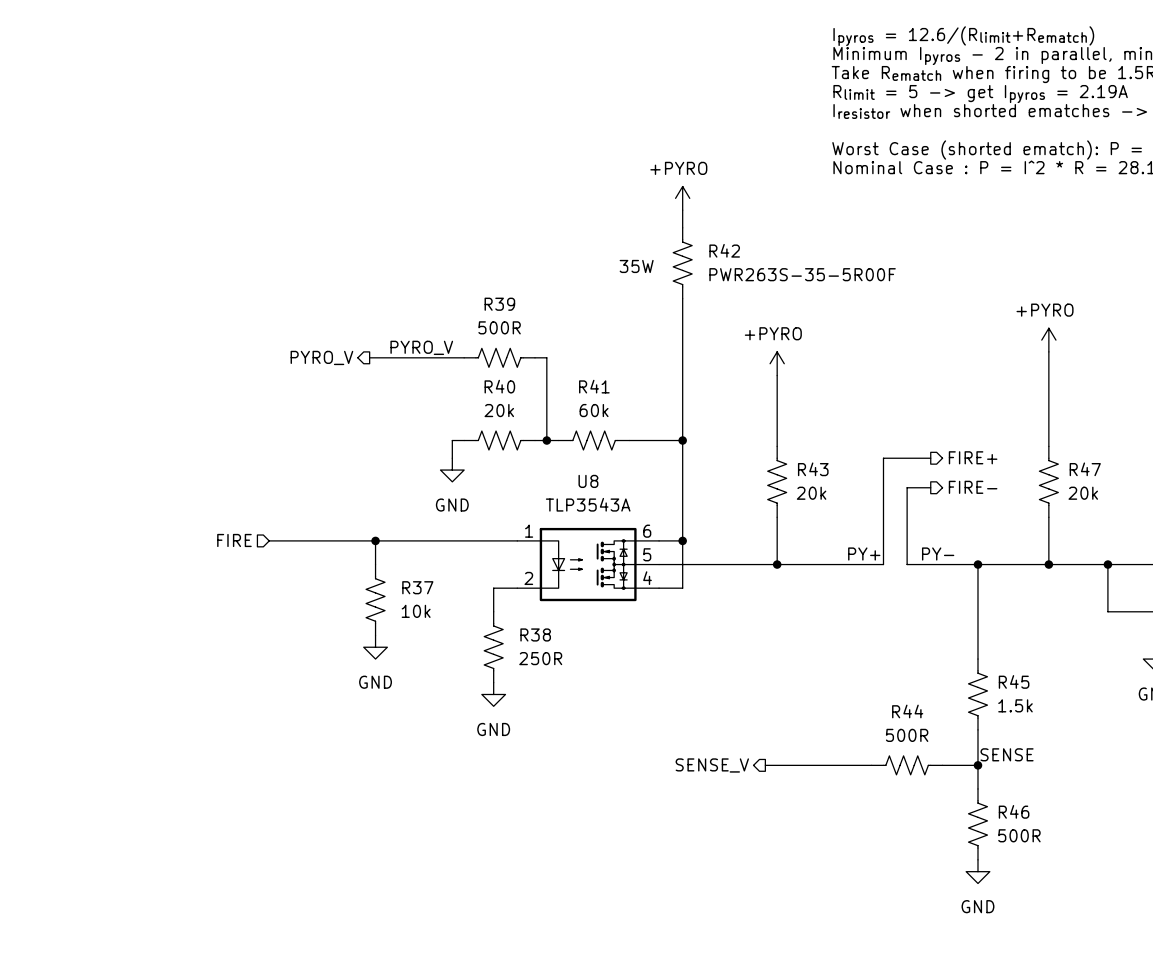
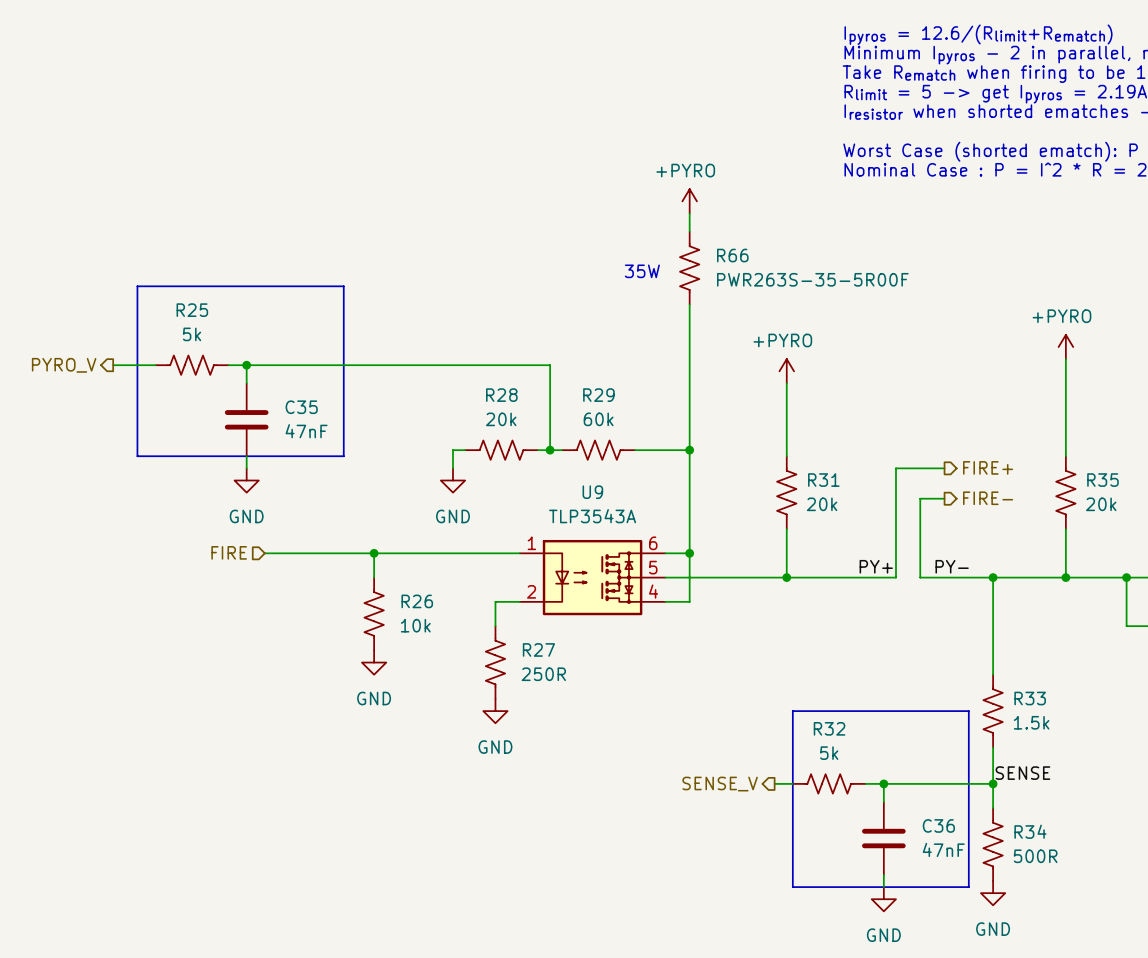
R42 name: R42 (724, 250) -> R66 (732, 255)
line: none -> (137, 286) (343, 286) (343, 456) (137, 456) (137, 286)
label: PYRO_V (421, 347) -> none
hierarchical label: none -> PYRO_V (64, 365)
wire: none -> (113, 365) (155, 365)
R25: none -> 5k (192, 365)
wire: none -> (228, 365) (368, 365)
wire: none -> (246, 365) (246, 383)
junction: none -> (246, 365)
hierarchical label: PYRO_V (321, 357) -> none
R39: 500R (499, 357) -> none
R40 name: R40 (499, 386) -> R28 (501, 395)
R41 name: R41 (594, 386) -> R29 (598, 395)
C35: none -> 47nF (246, 419)
wire: none -> (246, 456) (246, 468)
R43 name: R43 (813, 469) -> R31 (823, 480)
R47 name: R47 (1085, 469) -> R35 (1102, 480)
power symbol: none -> GND (246, 480)
U8 name: U8 (588, 481) -> U9 (592, 492)
R37 name: R37 (417, 587) -> R26 (417, 601)
R38 name: R38 (535, 634) -> R27 (538, 649)
R45 name: R45 (1014, 681) -> R33 (1030, 698)
line: none -> (792, 711) (968, 711) (968, 887) (792, 887) (792, 711)
R32: none -> 5k (829, 783)
junction: none -> (883, 783)
R44: 500R (907, 765) -> none
wire: none -> (956, 783) (883, 783) (883, 802)
R46 name: R46 (1014, 811) -> R34 (1030, 831)
C36: none -> 47nF (883, 838)
wire: none -> (883, 874) (883, 887)
power symbol: none -> GND (883, 899)

